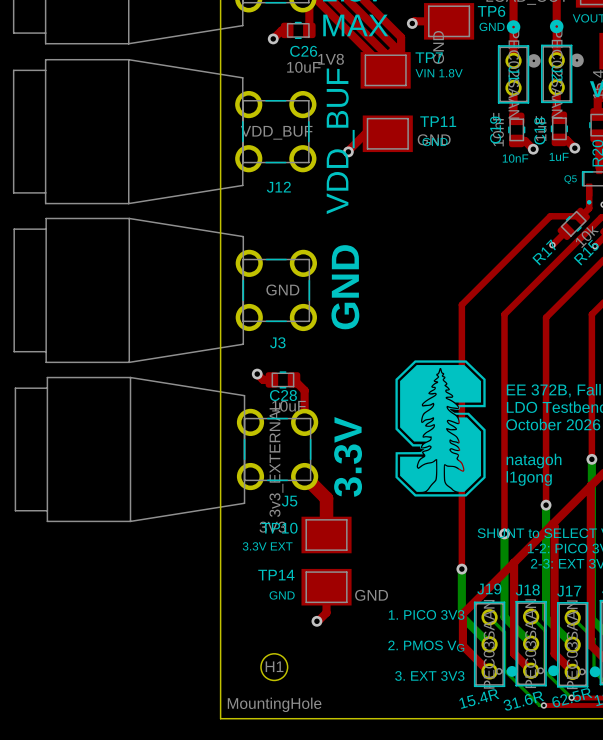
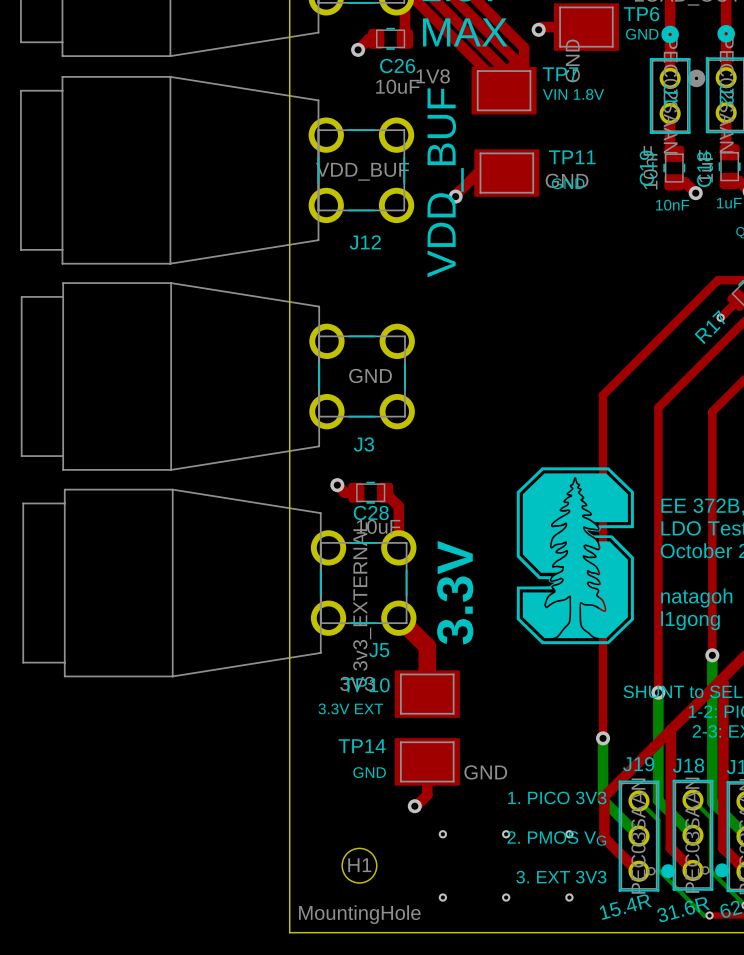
text: GND (345, 287) -> none
via: none -> (442, 834)
via: none -> (506, 834)
via: none -> (569, 834)
via: none -> (442, 897)
via: none -> (506, 897)
via: none -> (569, 897)

